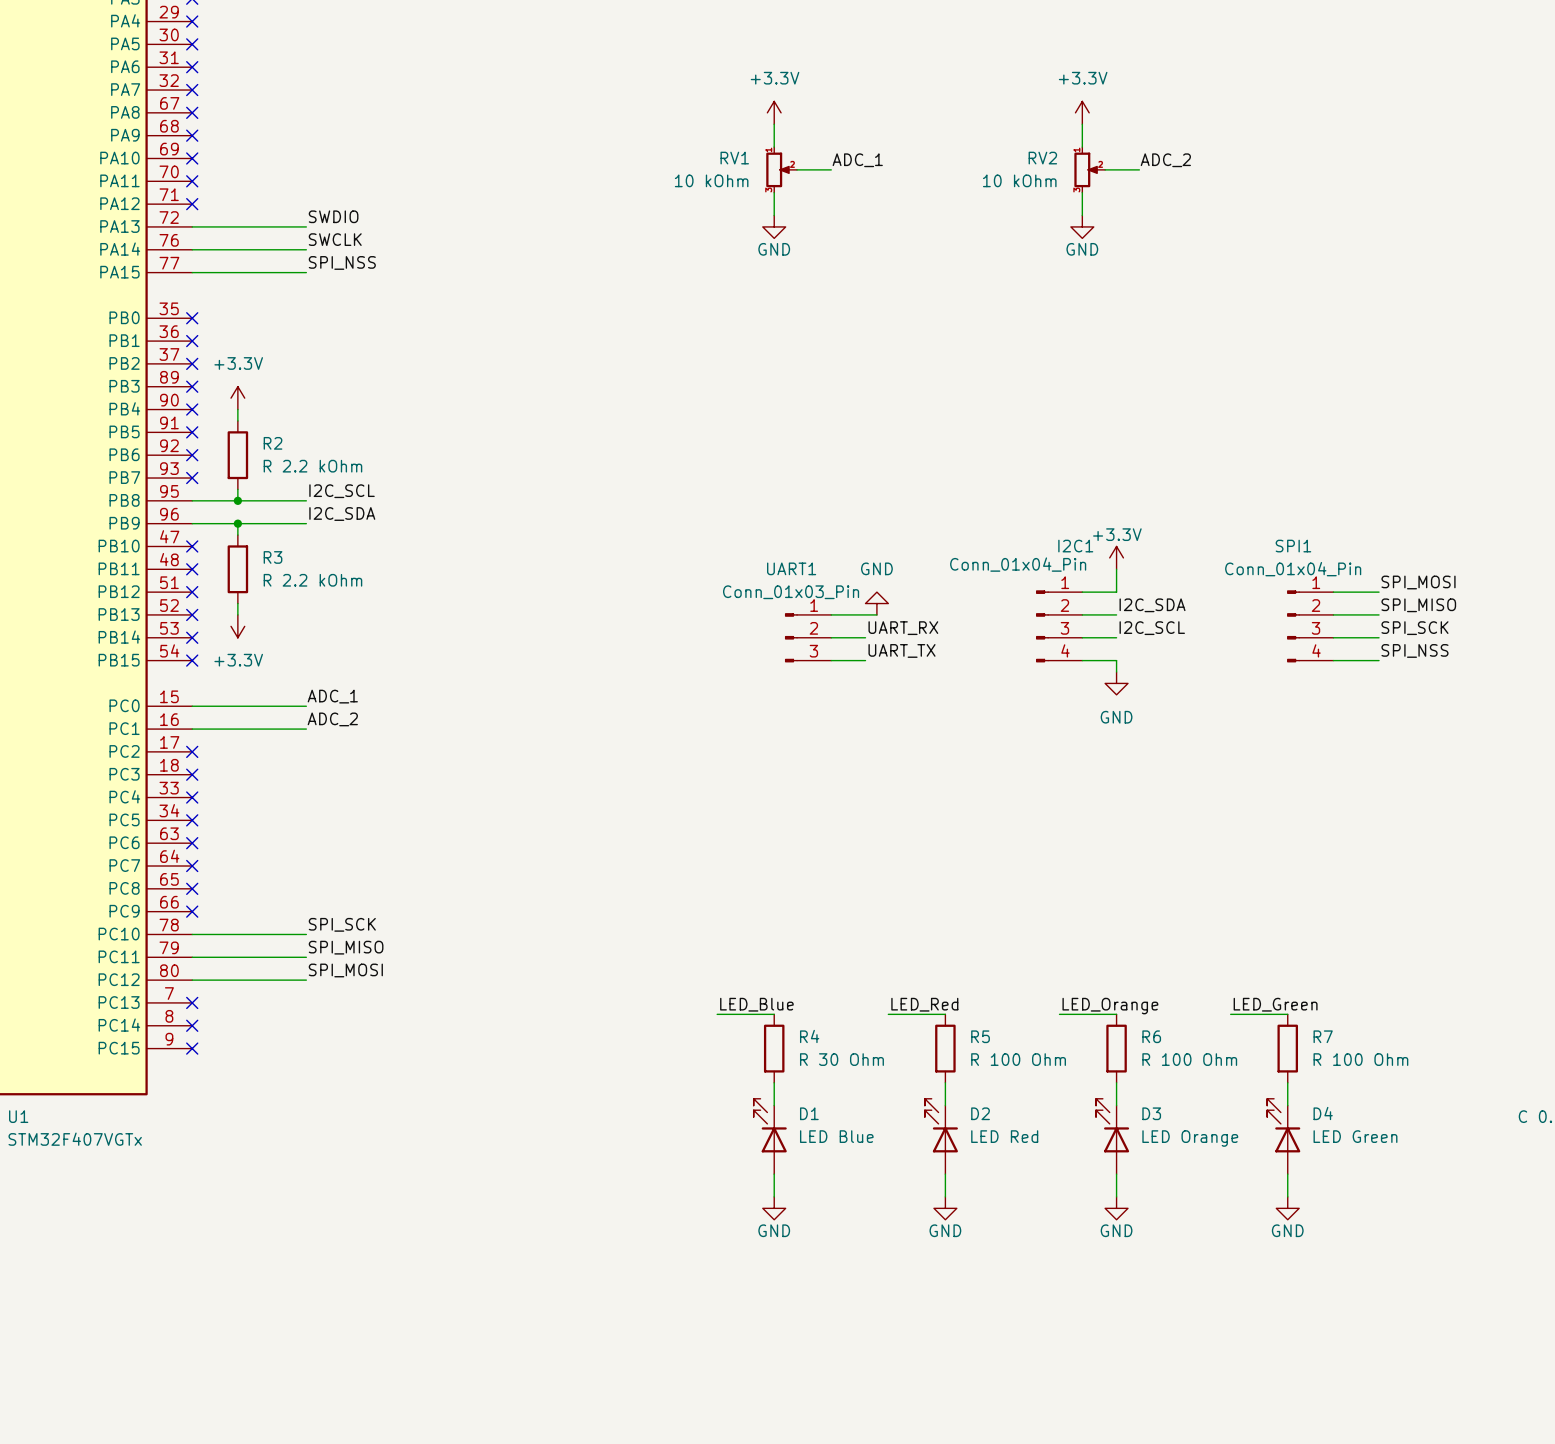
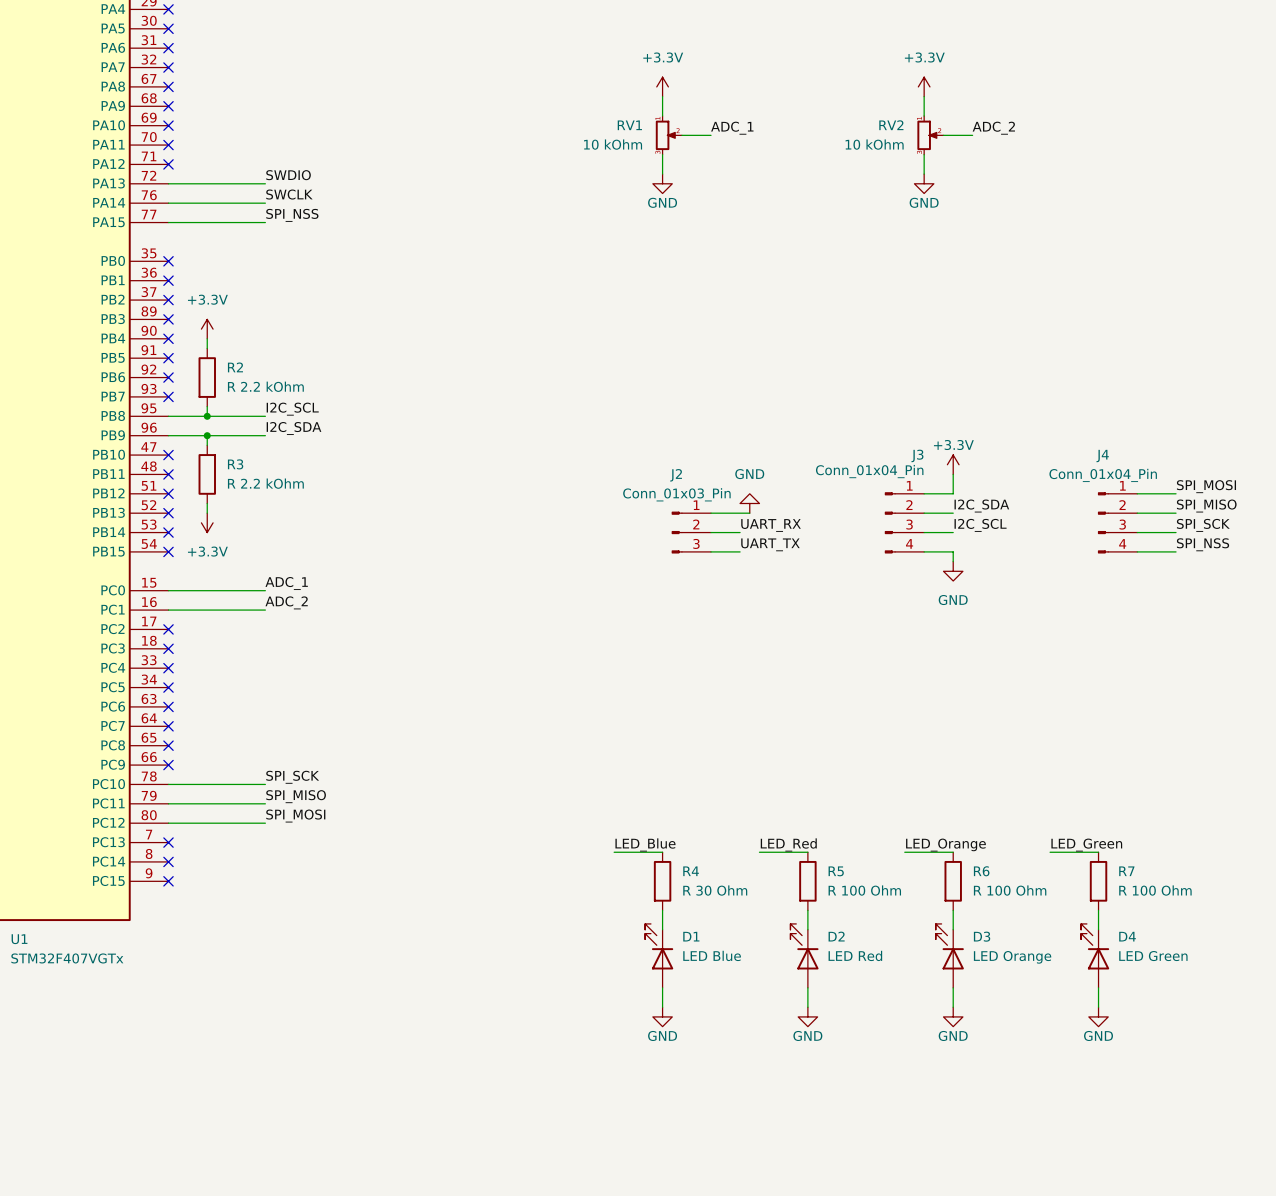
I2C1 name: I2C1 (1075, 546) -> J3 (917, 455)
SPI1 name: SPI1 (1293, 546) -> J4 (1102, 456)
UART1 name: UART1 (791, 568) -> J2 (676, 475)

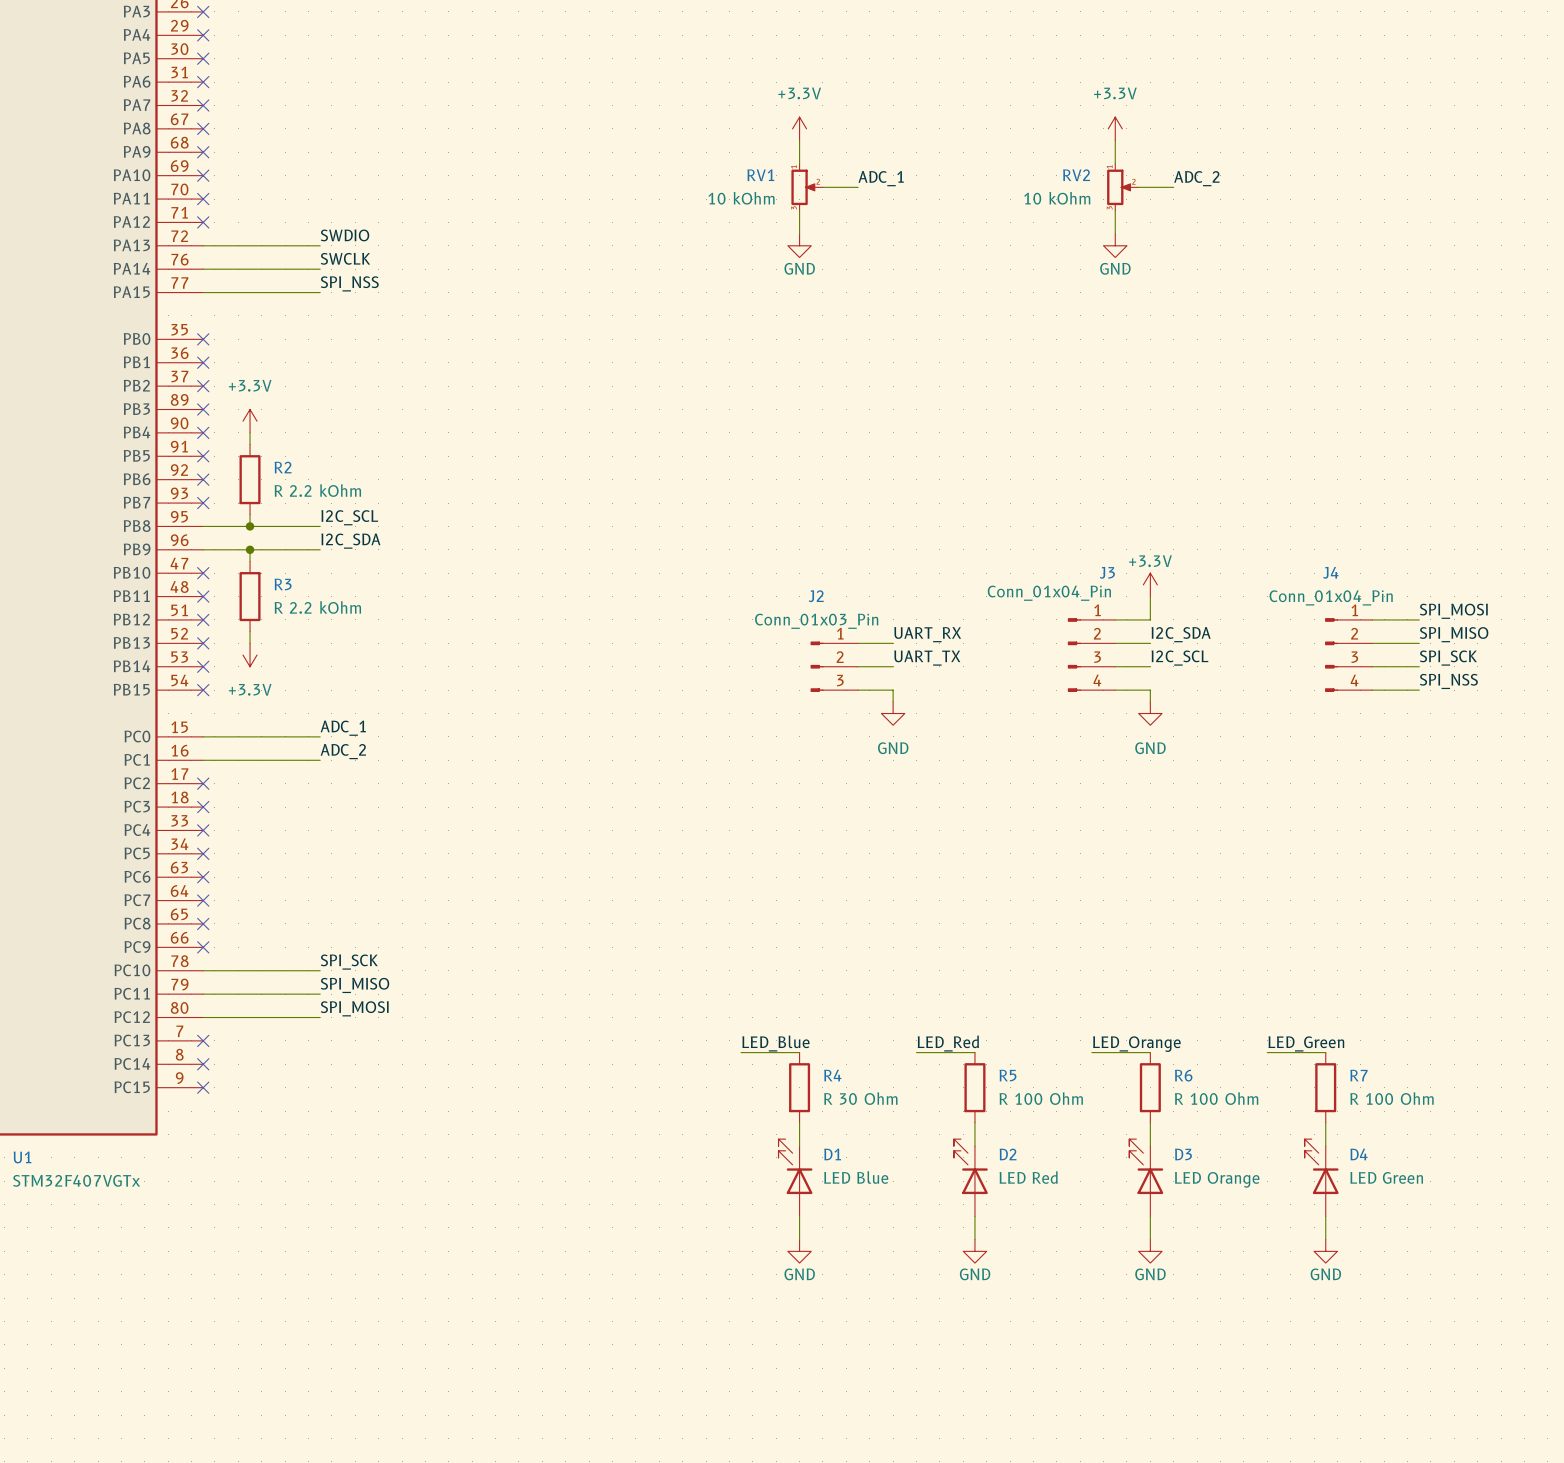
power symbol rotation: 0° (749, 503) -> 180° (893, 713)
power symbol position: GND (749, 503) -> GND (893, 713)
label: none -> UART_RX (927, 634)
wire: (740, 513) (749, 513) -> none
label: UART_RX (771, 525) -> UART_TX (927, 658)
label: UART_TX (770, 544) -> none
wire: none -> (893, 690) (893, 701)

